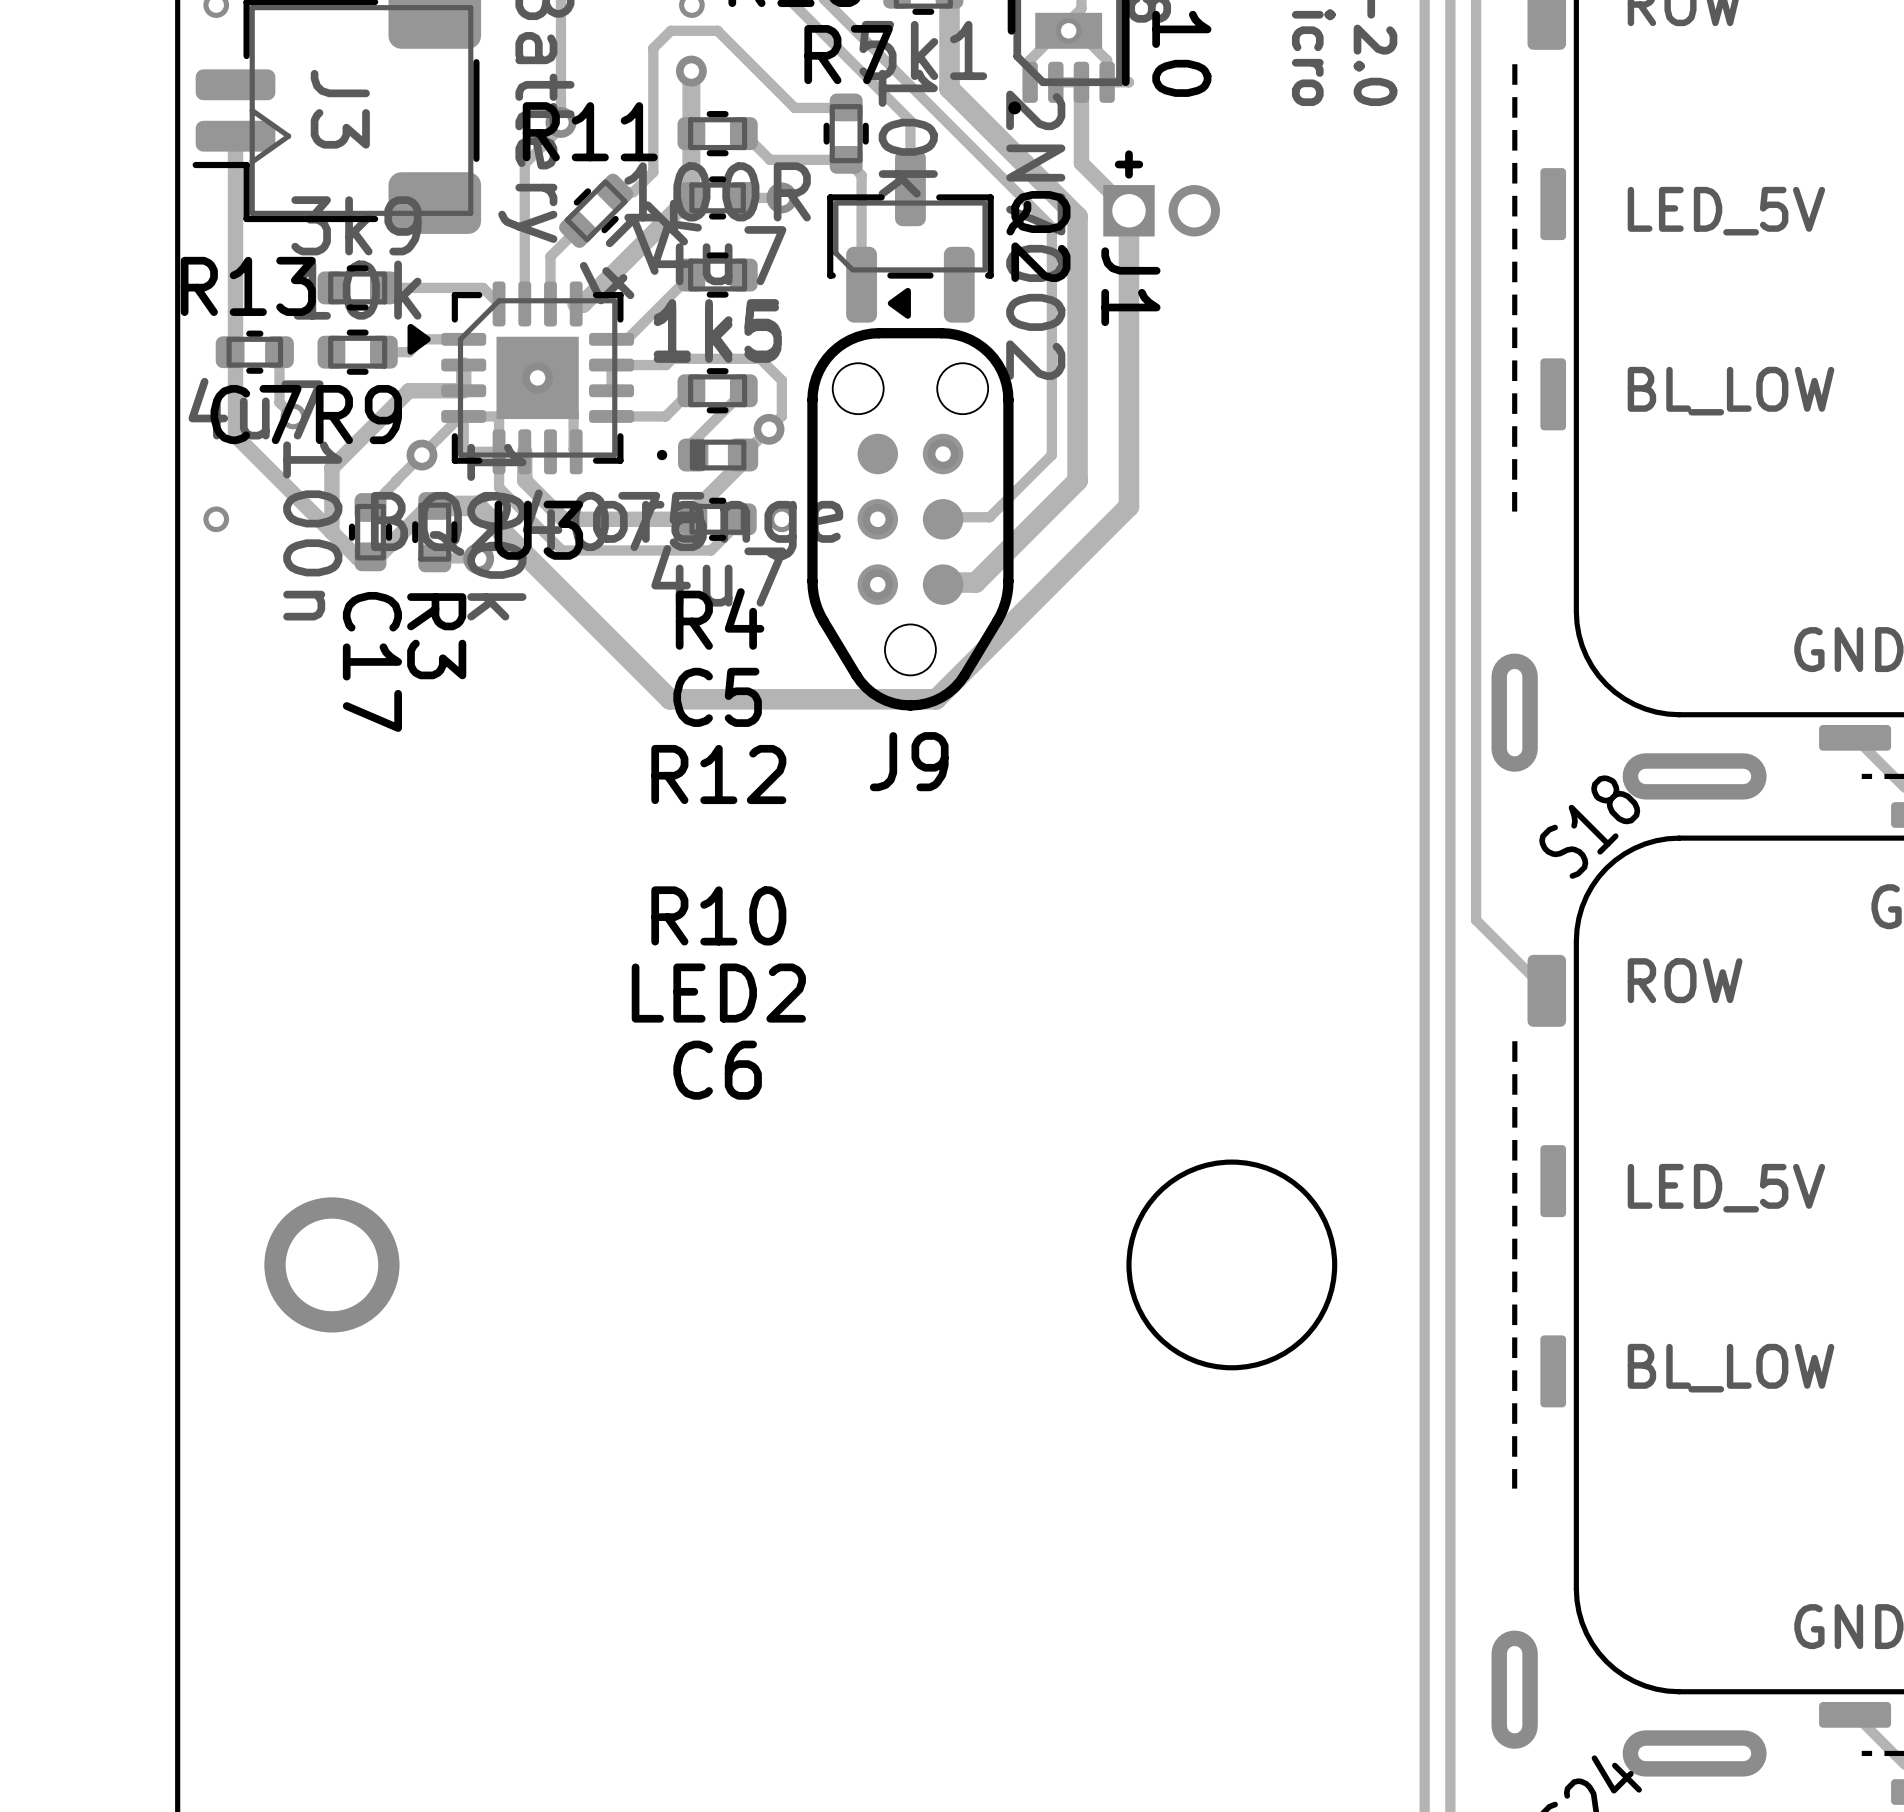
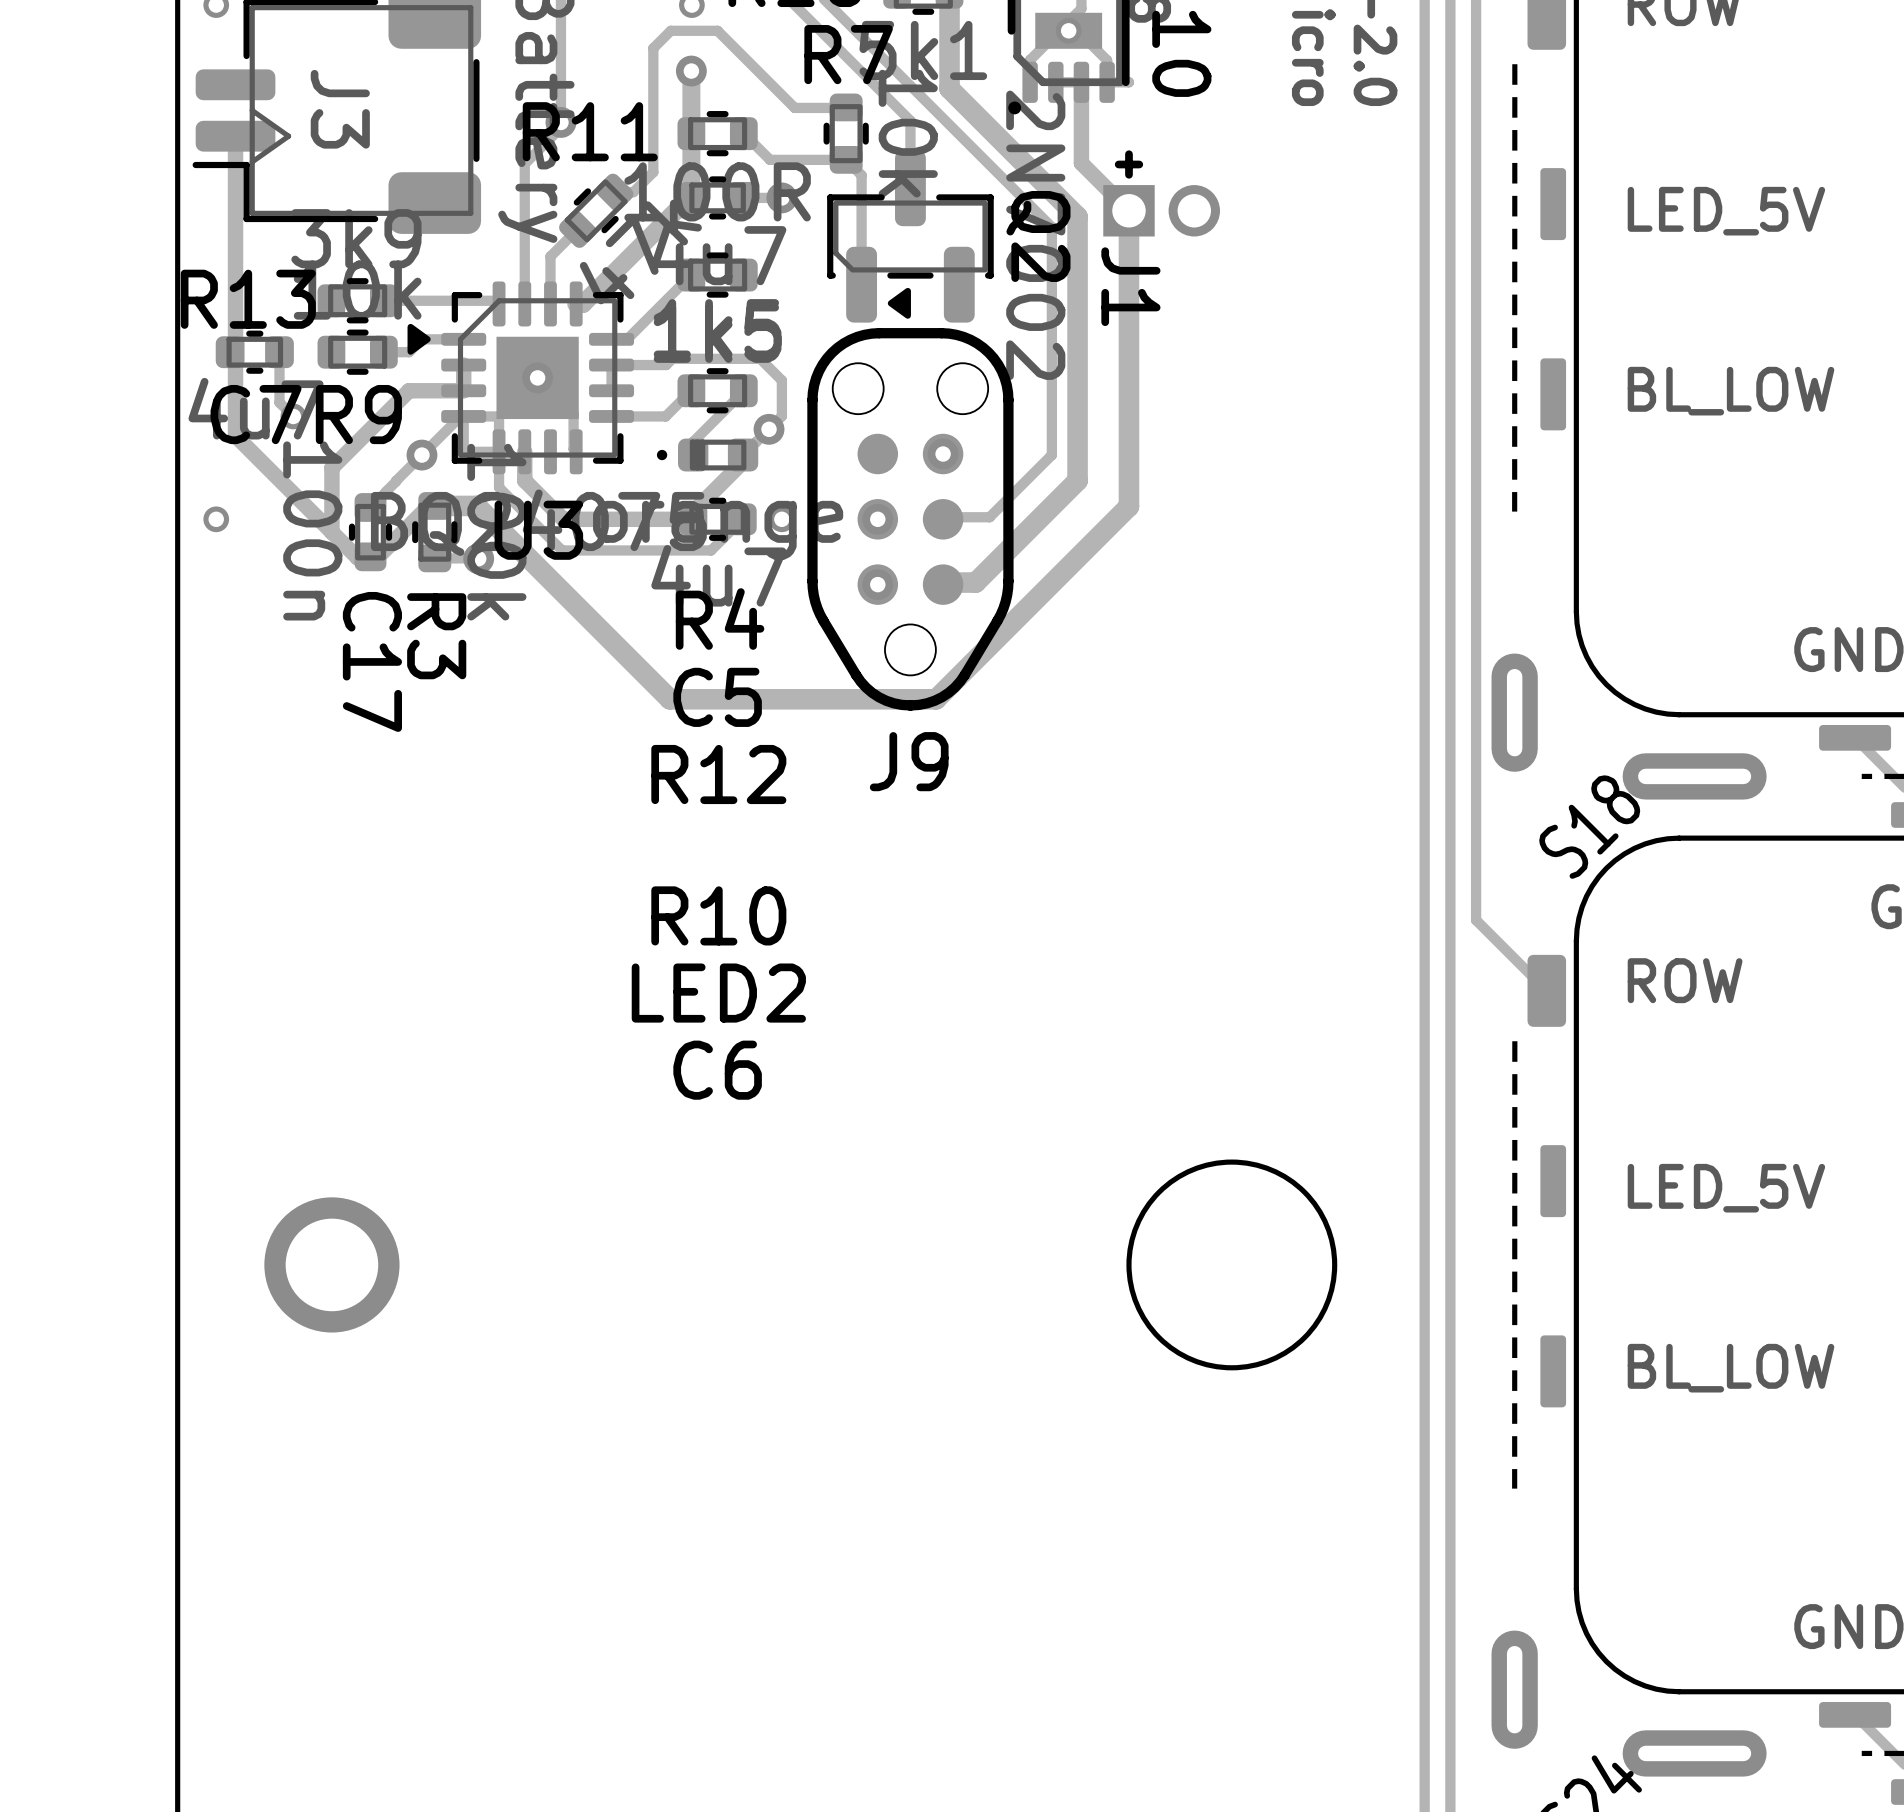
R13 position: (357, 287) -> (357, 300)
track: (383, 287) (482, 287) (495, 300) -> (383, 300) (495, 300)

